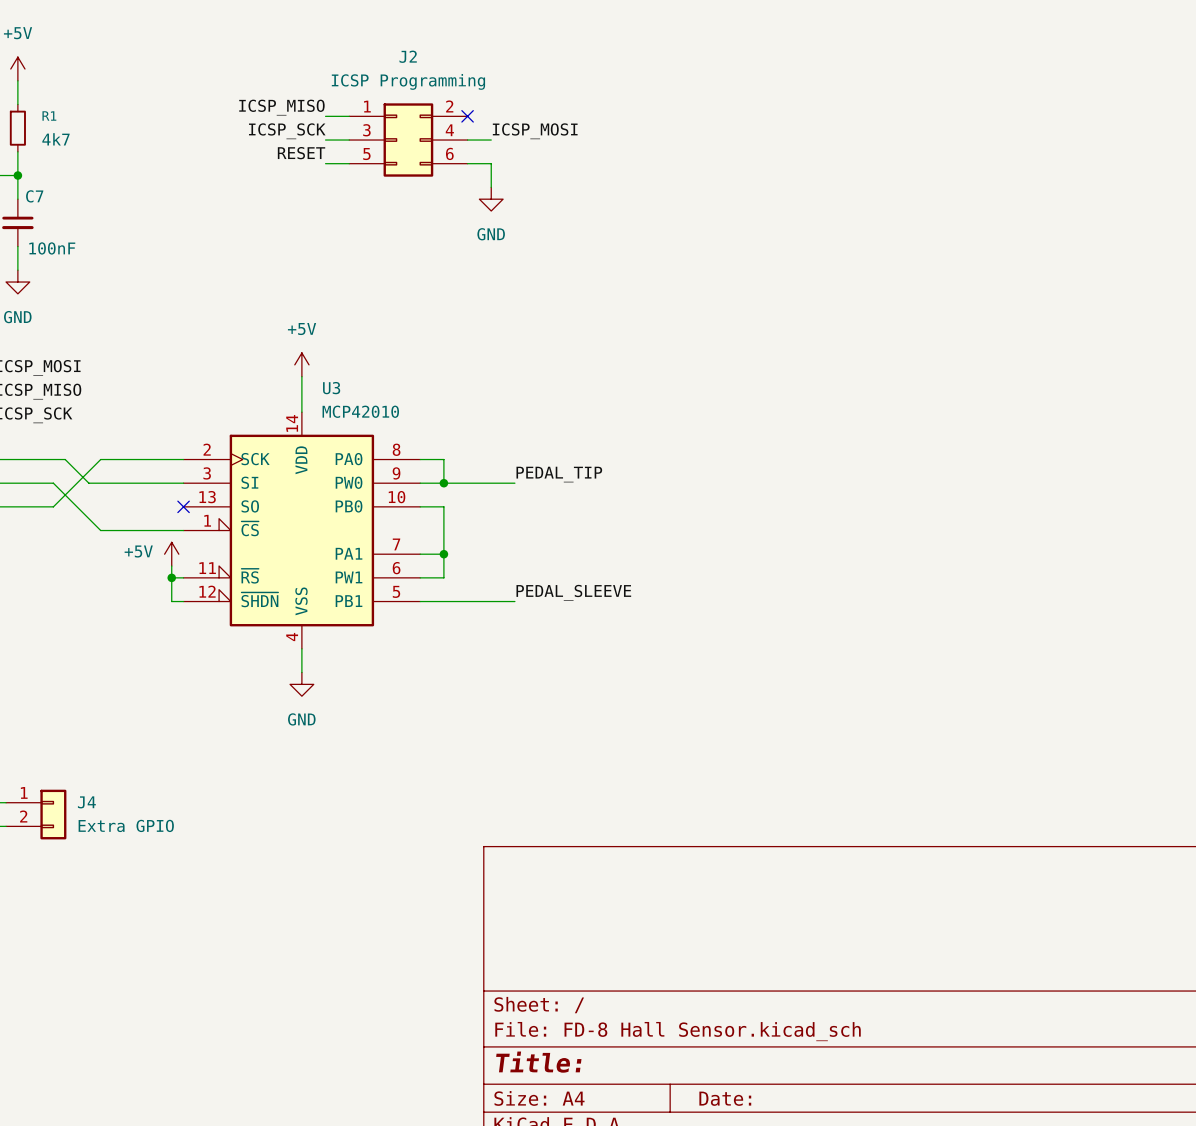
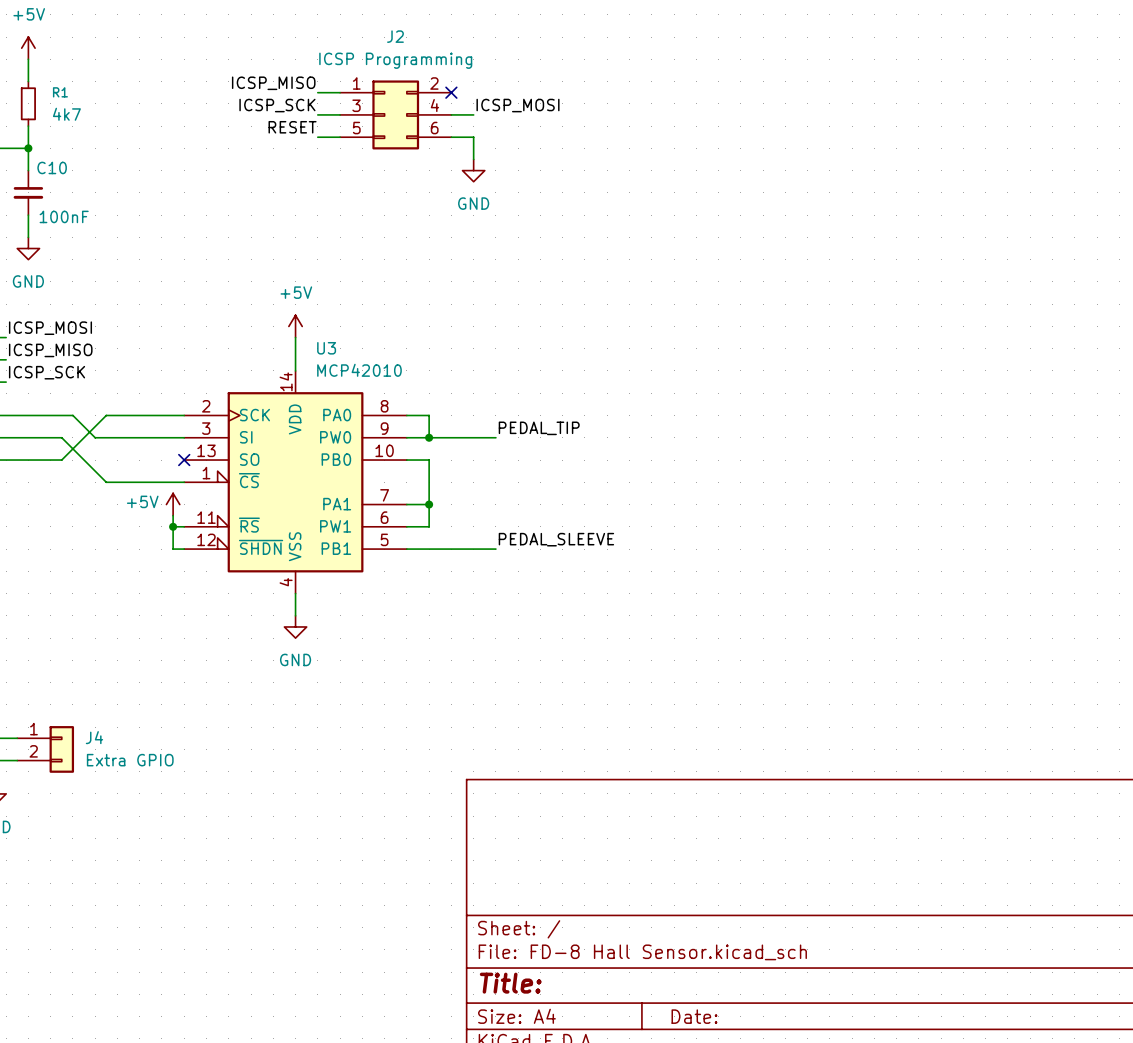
C7 name: C7 (34, 196) -> C10 (52, 167)

